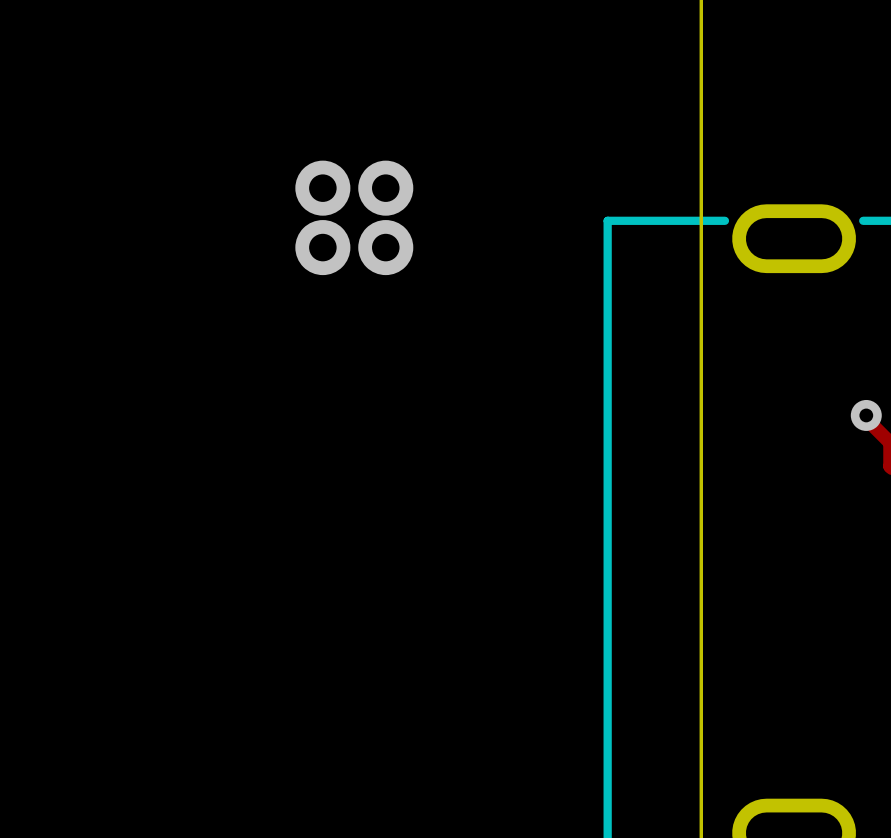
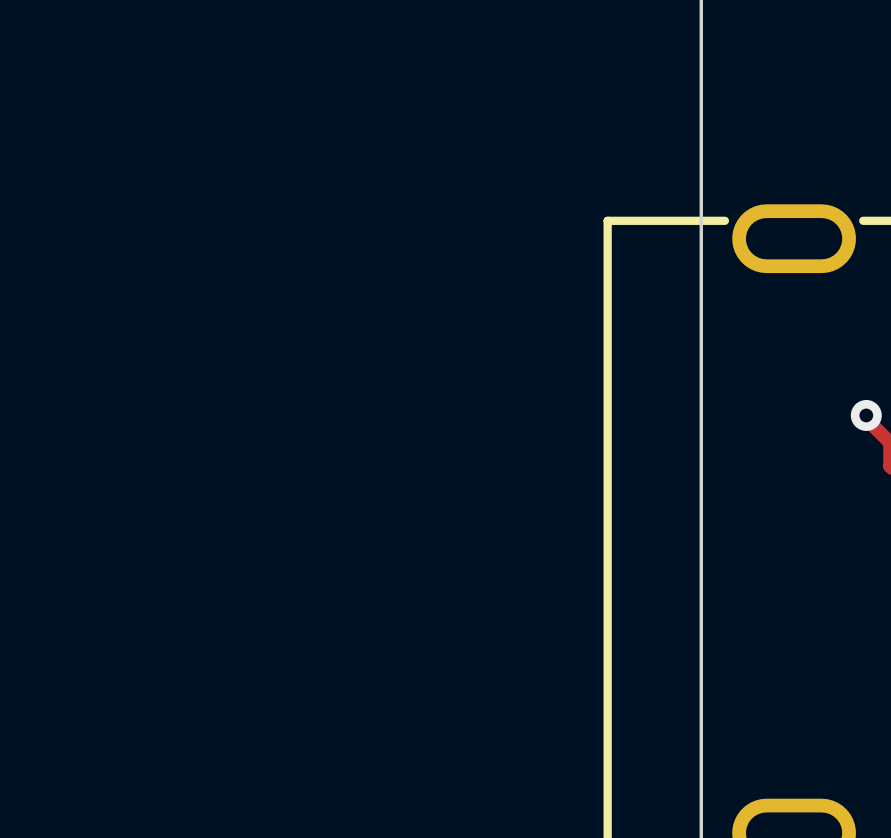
via: (322, 188) -> none
via: (385, 188) -> none
via: (322, 247) -> none
via: (385, 247) -> none

